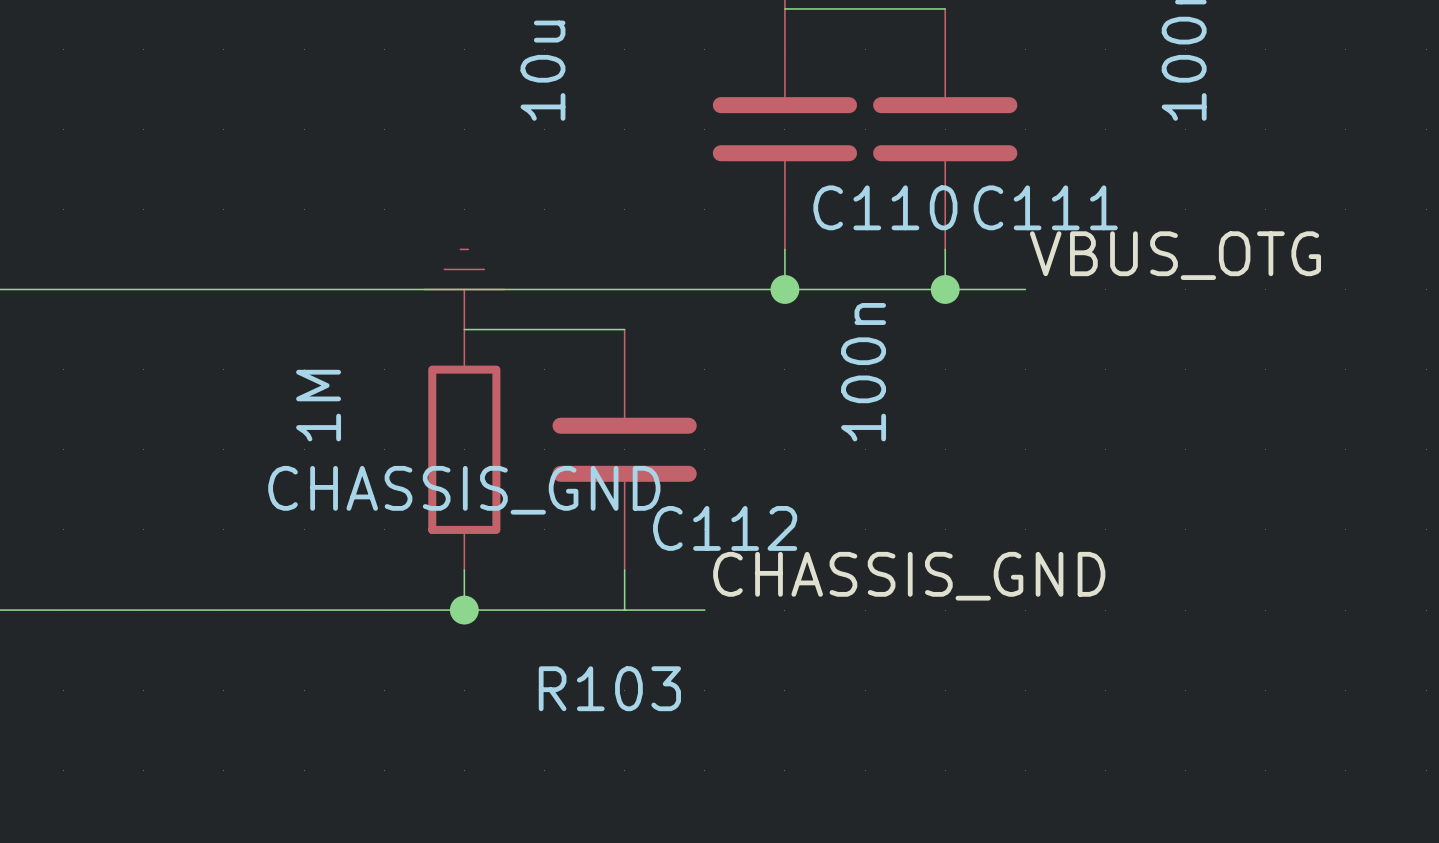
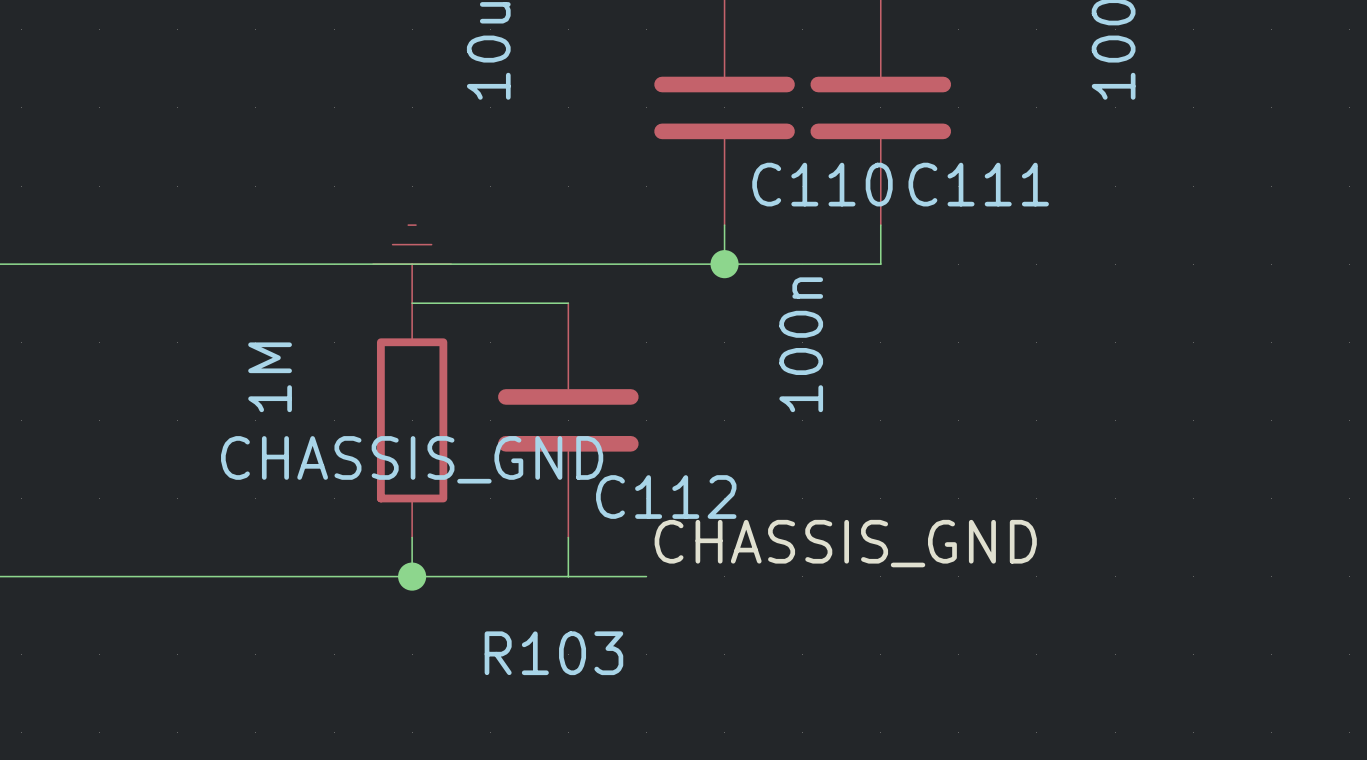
label: VBUS_OTG (1175, 255) -> none
wire: (945, 289) (1025, 289) -> none
junction: (945, 289) -> none

